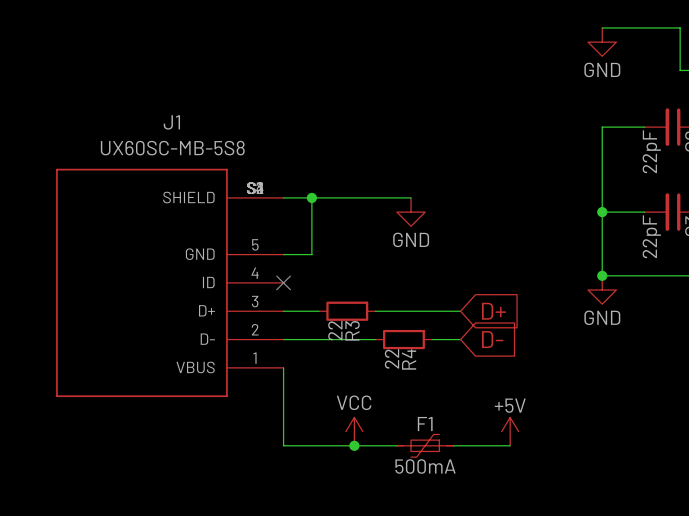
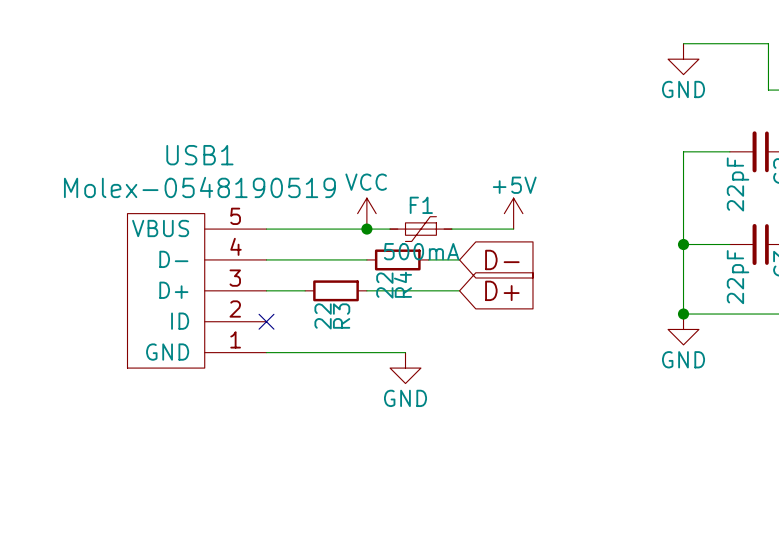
wire: (311, 197) (311, 254) (283, 254) -> none
wire: none -> (475, 229) (513, 229)
power symbol position: GND (411, 212) -> GND (405, 368)
USB1: none -> Molex-0548190519 (197, 290)
J1: UX60SC-MB-5S8 (169, 282) -> none
no-connect mark position: (283, 282) -> (266, 321)
wire: none -> (374, 352) (405, 352)
R3 position: (347, 311) -> (336, 290)
wire: (375, 311) (460, 311) -> (366, 290) (459, 290)
global label position: D+ (493, 311) -> D+ (502, 290)
wire: (283, 339) (375, 339) -> (266, 259) (366, 259)
R4 position: (403, 339) -> (397, 259)
wire: (432, 339) (460, 339) -> (428, 259) (459, 259)
global label position: D- (492, 339) -> D- (502, 259)
wire: (283, 367) (283, 445) (396, 445) -> none
power symbol position: VCC (354, 431) -> VCC (366, 213)
power symbol position: +5V (510, 431) -> +5V (513, 213)
junction: (354, 445) -> none
F1 position: (425, 445) -> (420, 229)
wire: (453, 445) (510, 445) -> none

